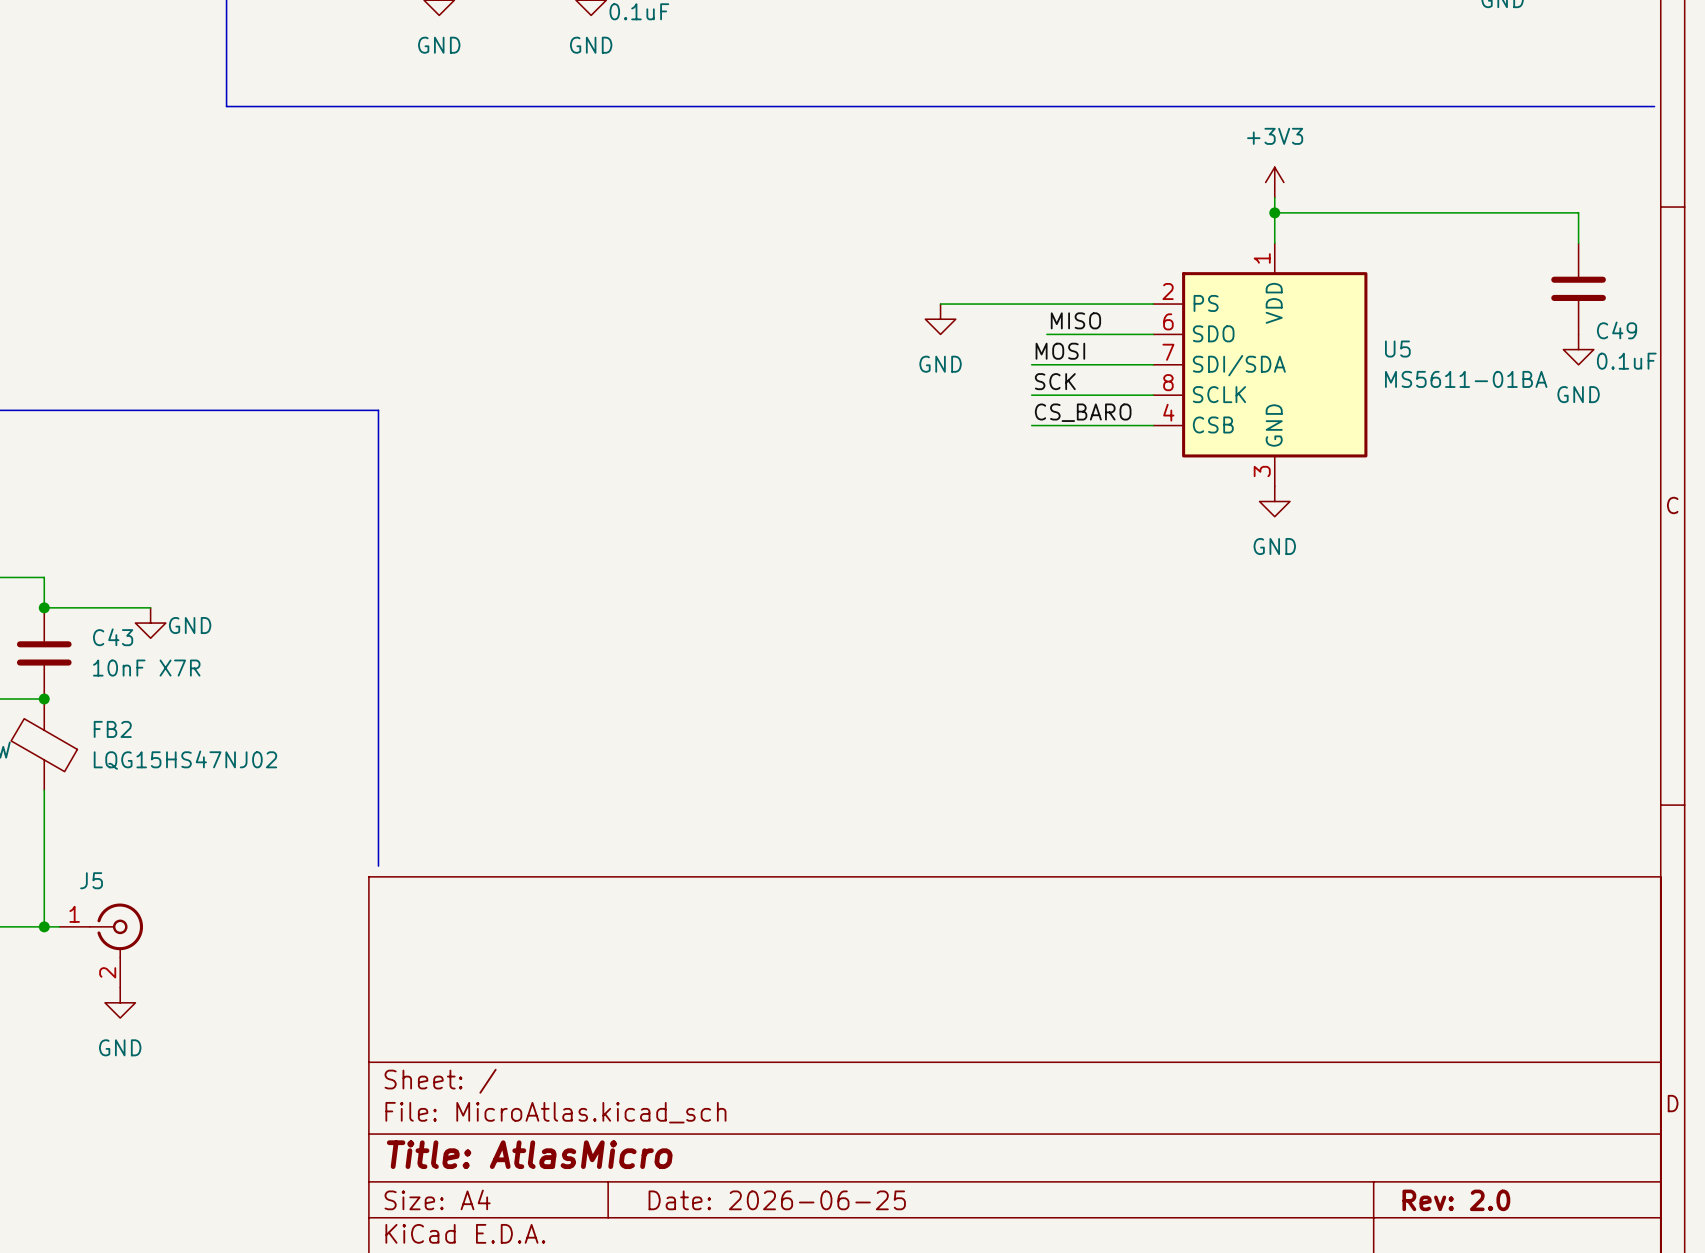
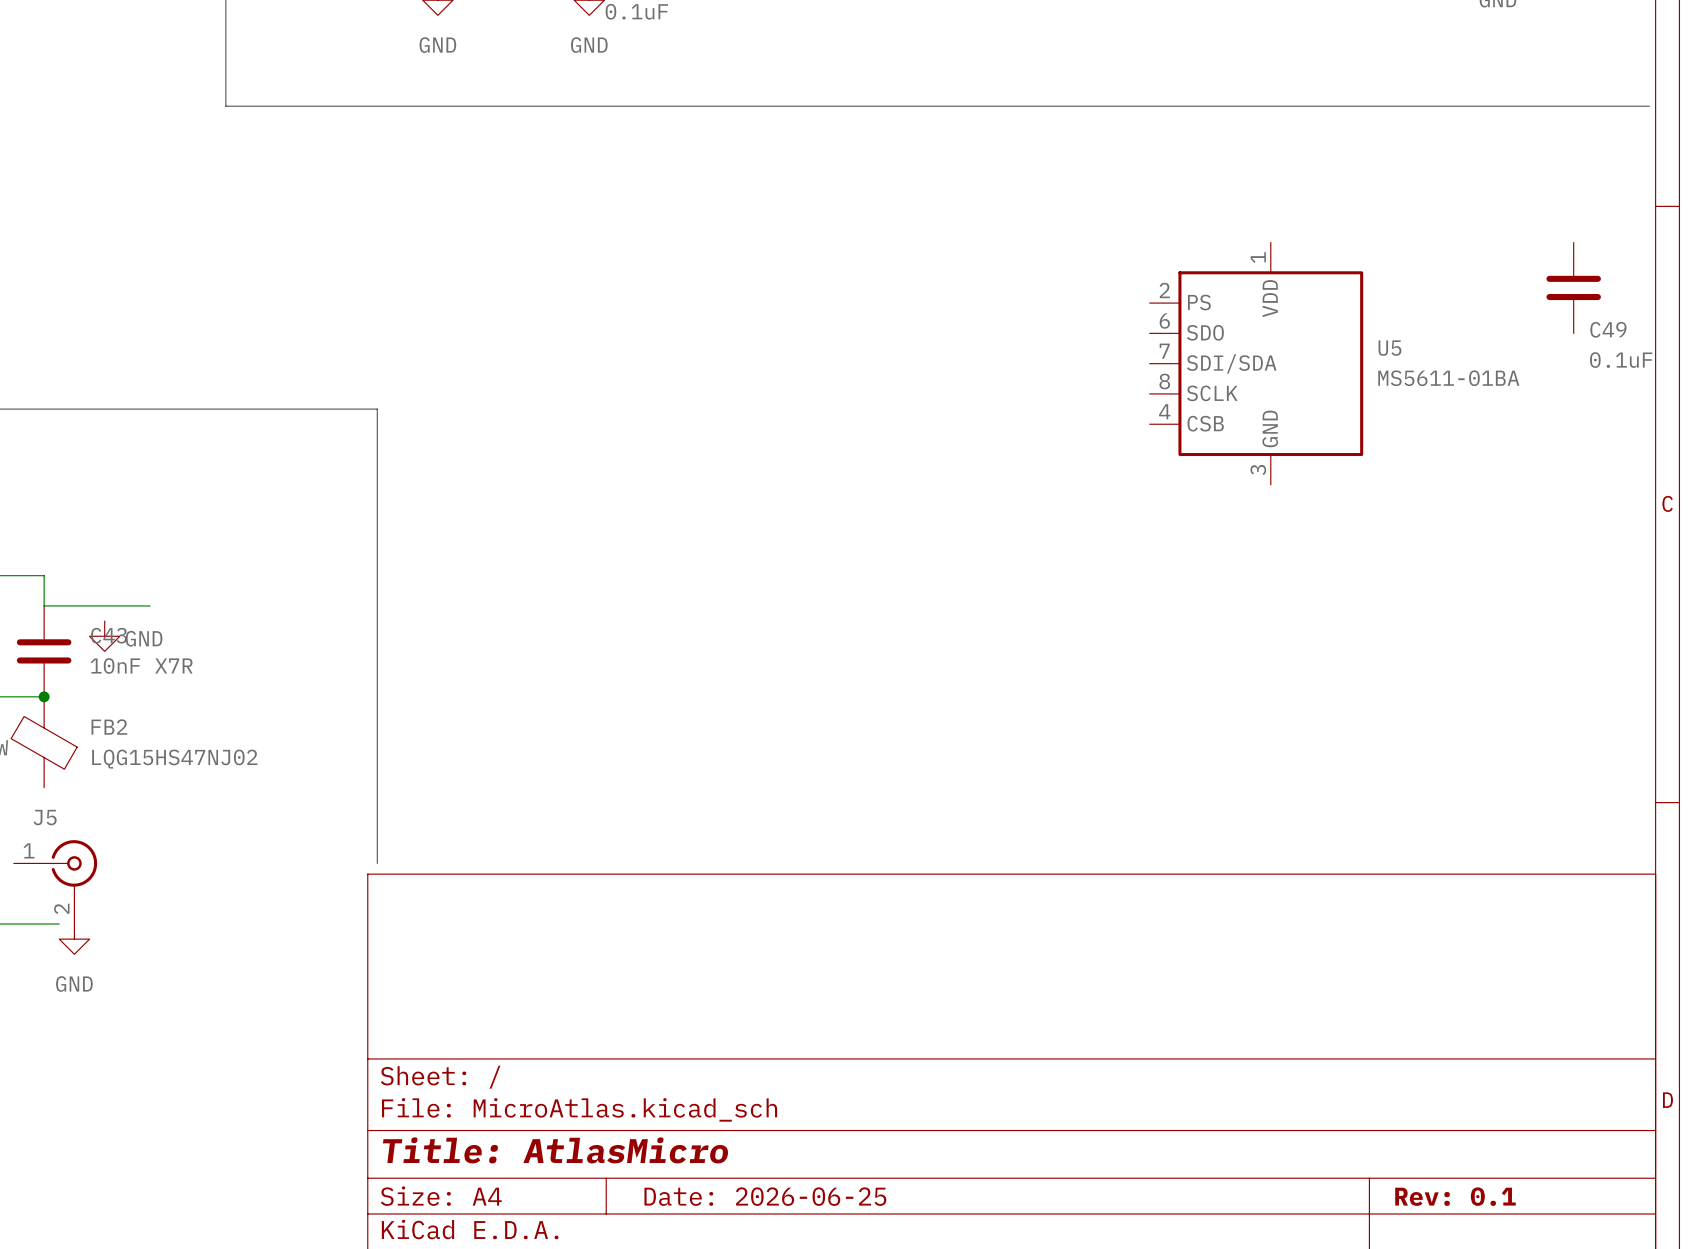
power symbol: +3V3 (1274, 182) -> none
wire: (1274, 197) (1274, 243) -> none
wire: (1274, 212) (1578, 212) (1578, 243) -> none
junction: (1274, 212) -> none
wire: (940, 304) (1153, 304) -> none
power symbol: GND (940, 319) -> none
label: MISO (1075, 320) -> none
wire: (1046, 334) (1153, 334) -> none
power symbol: GND (1578, 349) -> none
label: MOSI (1060, 351) -> none
wire: (1031, 364) (1153, 364) -> none
label: SCK (1055, 381) -> none
wire: (1031, 395) (1153, 395) -> none
label: CS_BARO (1083, 412) -> none
wire: (1031, 425) (1153, 425) -> none
power symbol: GND (1274, 501) -> none
junction: (44, 607) -> none
power symbol position: GND (150, 623) -> GND (104, 636)
wire: (44, 790) (44, 926) -> none
junction: (44, 926) -> none
J5 position: (101, 945) -> (55, 882)
power symbol position: GND (120, 1002) -> GND (74, 939)
title block: Rev: 2.0 (1456, 1200) -> Rev: 0.1 (1455, 1196)

